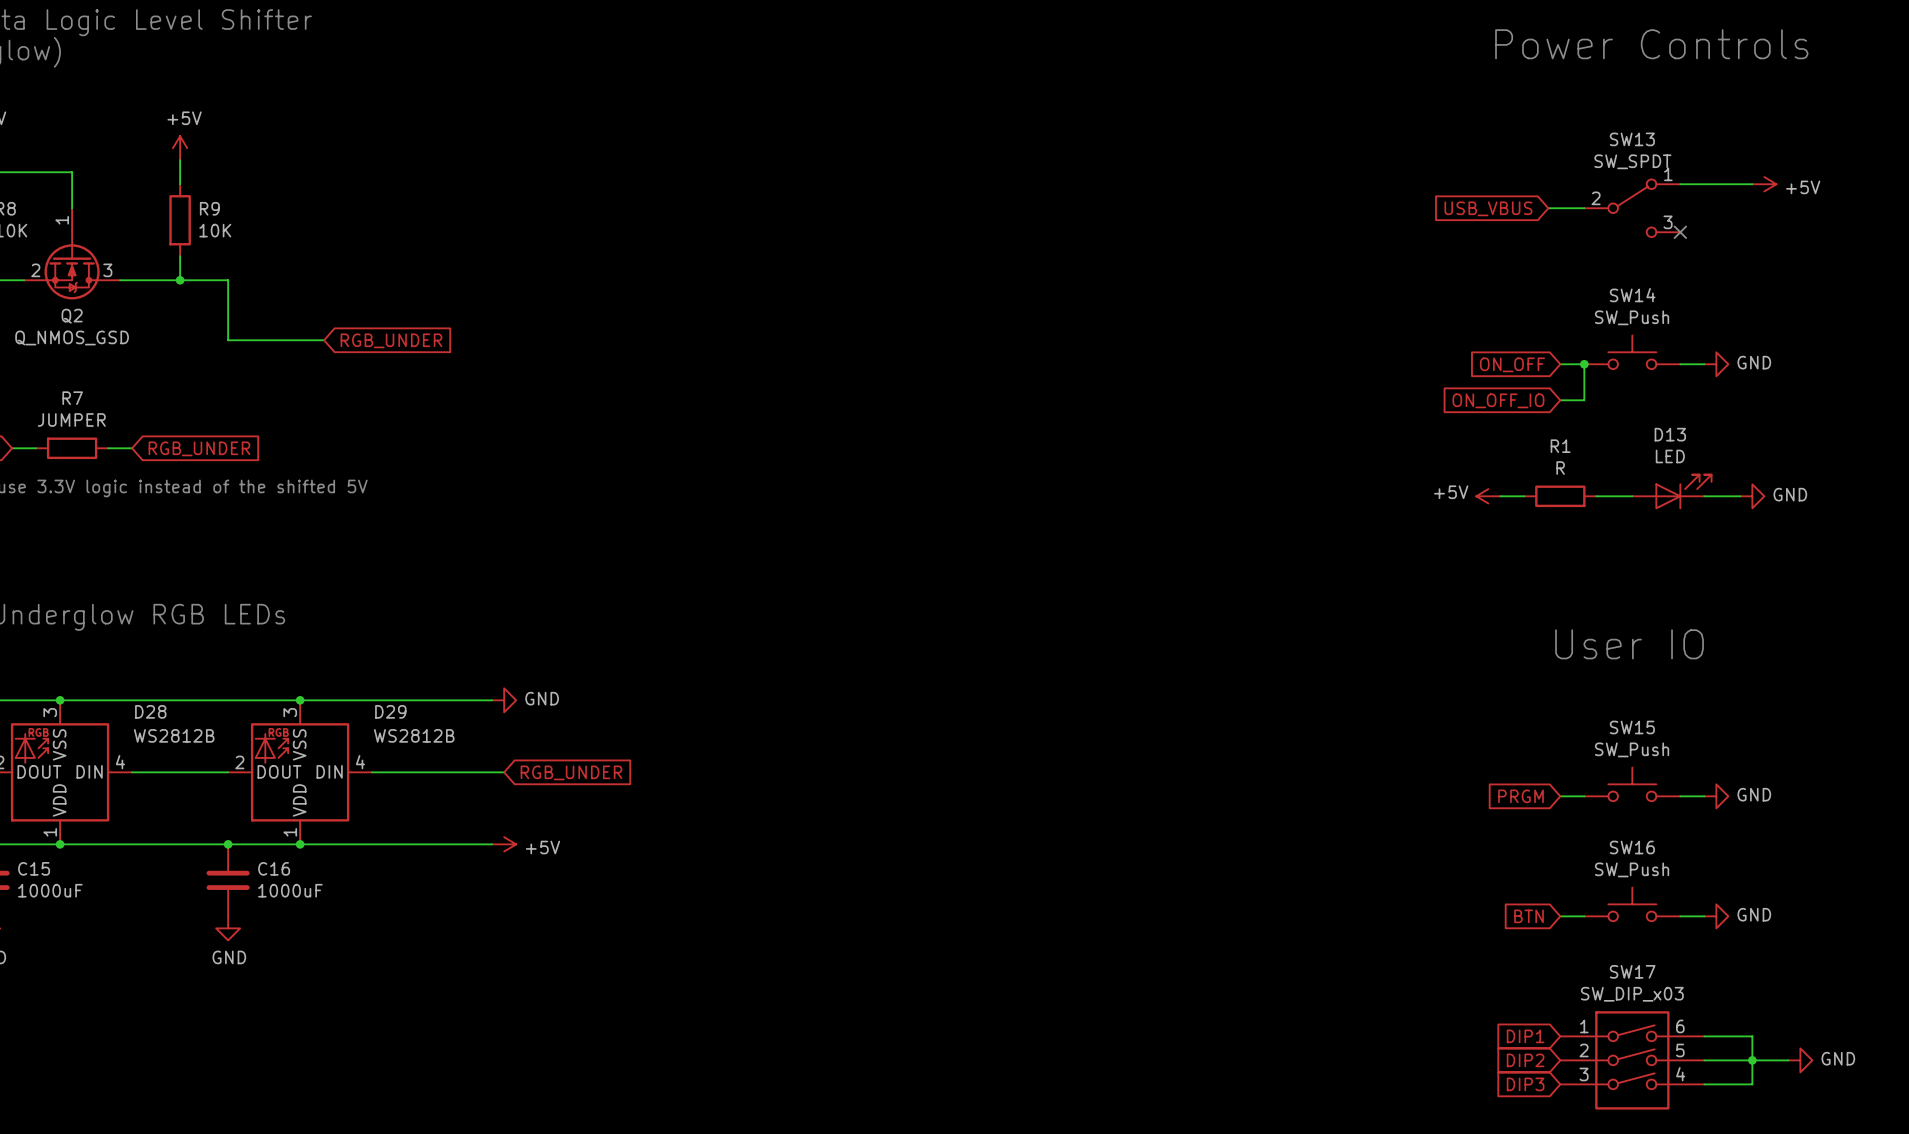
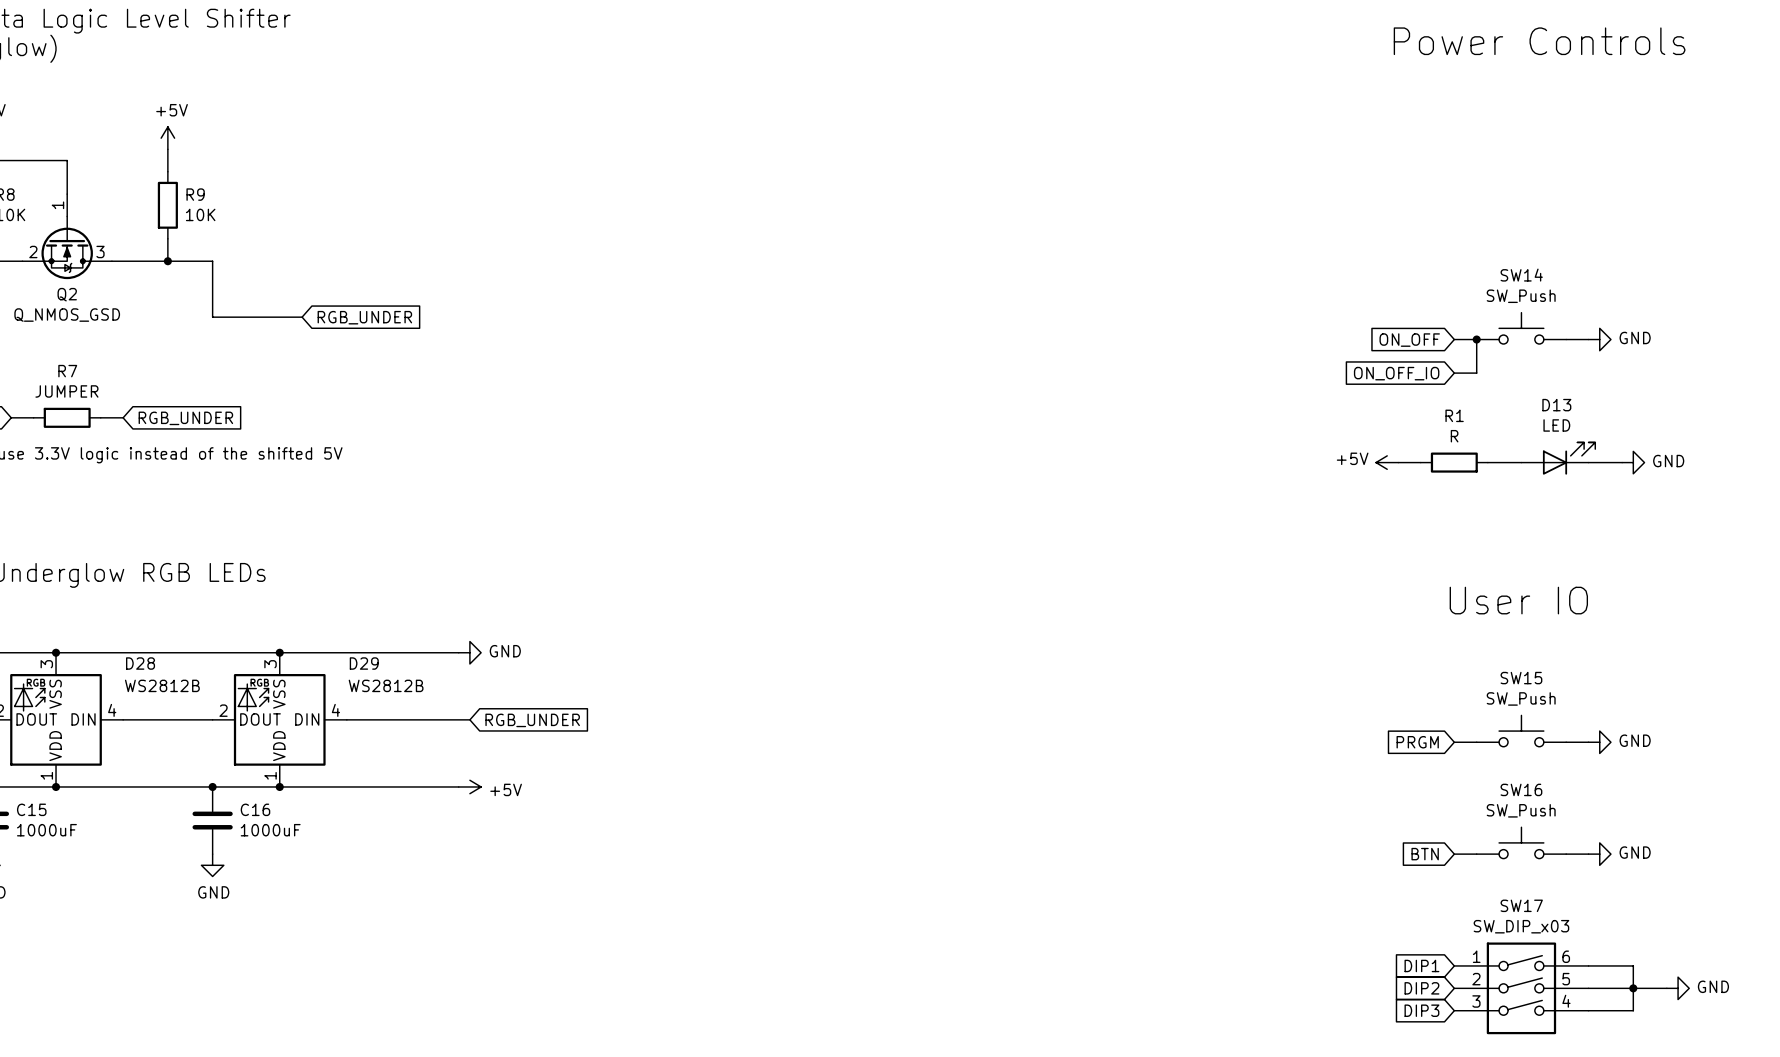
wire: (1680, 184) (1752, 184) -> none
power symbol: +5V (1764, 184) -> none
global label: USB_VBUS (1488, 208) -> none
wire: (1548, 208) (1584, 208) -> none
SW13: SW_SPDT (1632, 208) -> none
no-connect mark: (1680, 232) -> none

